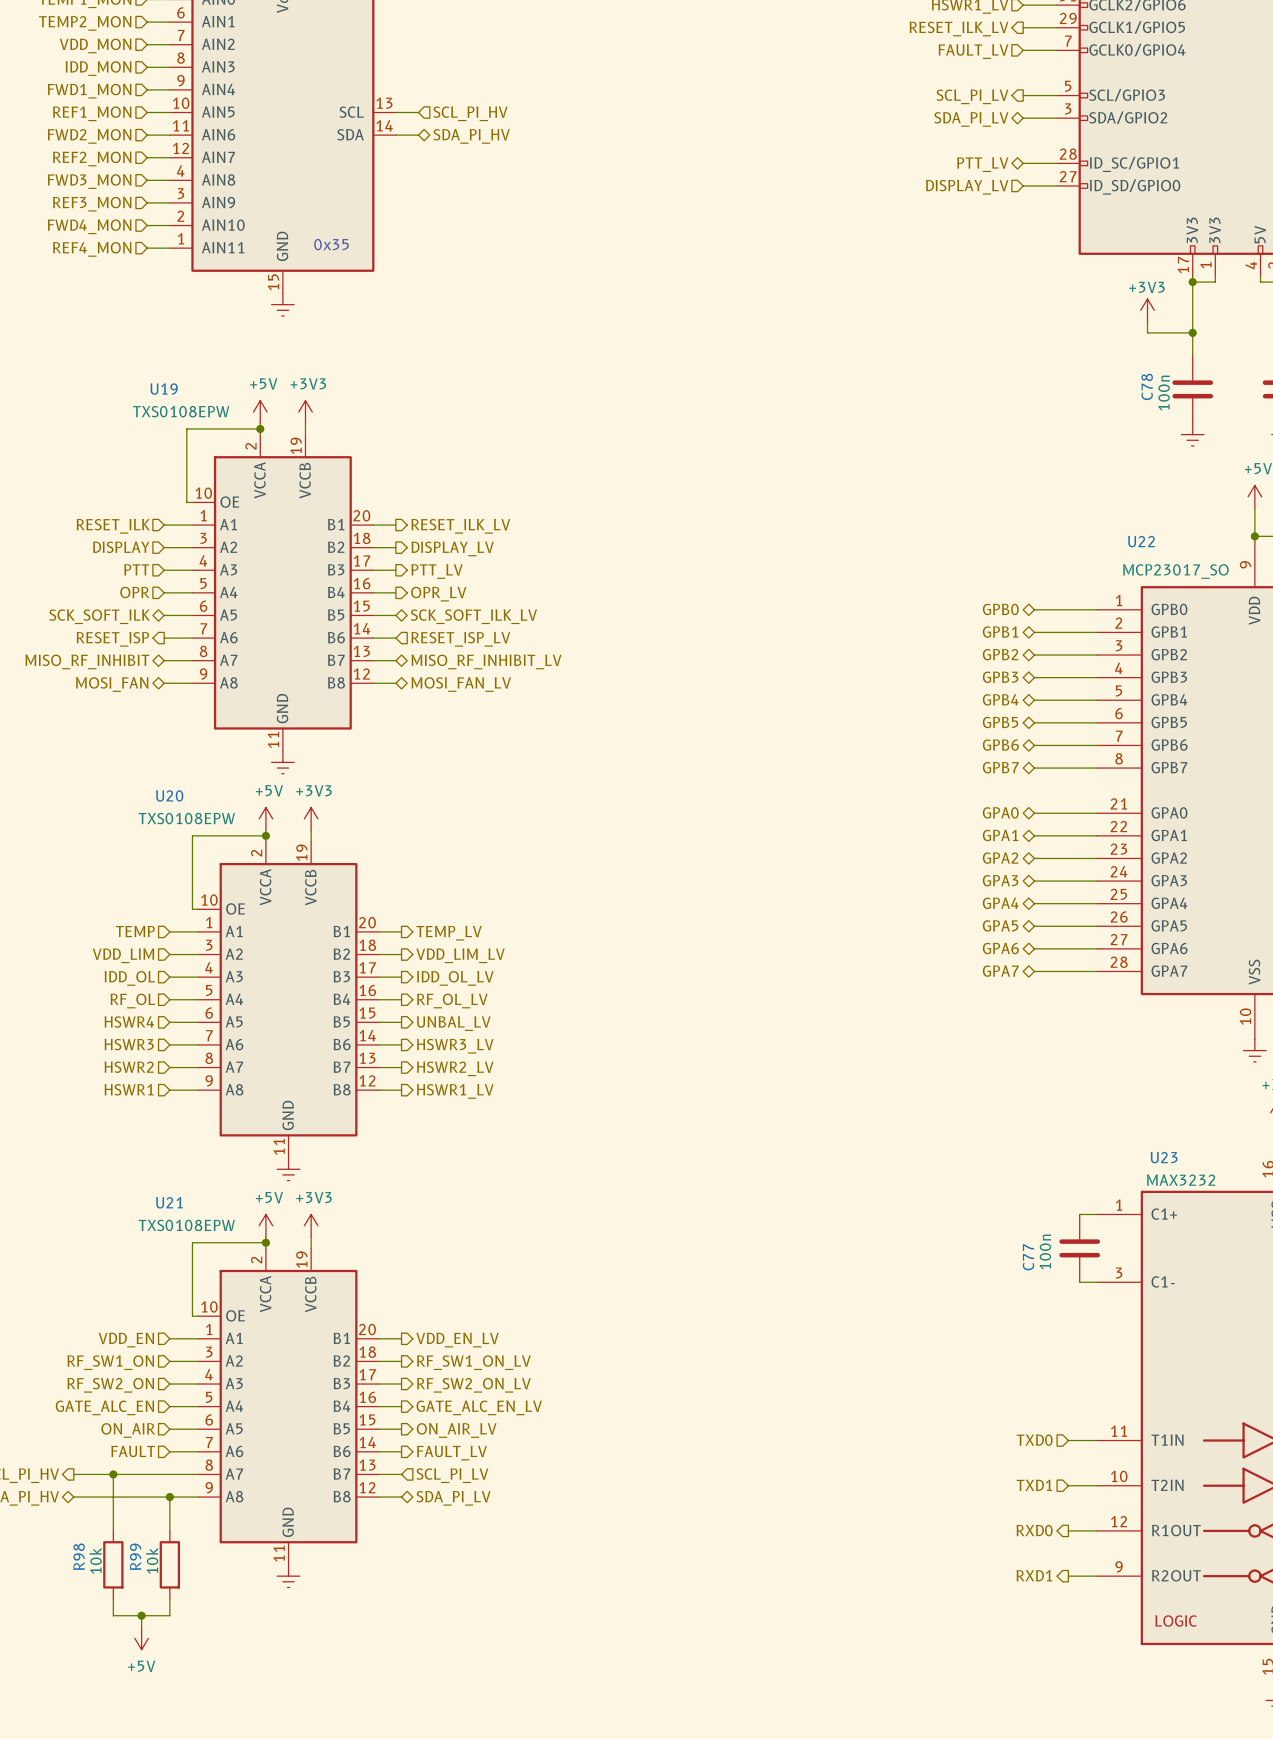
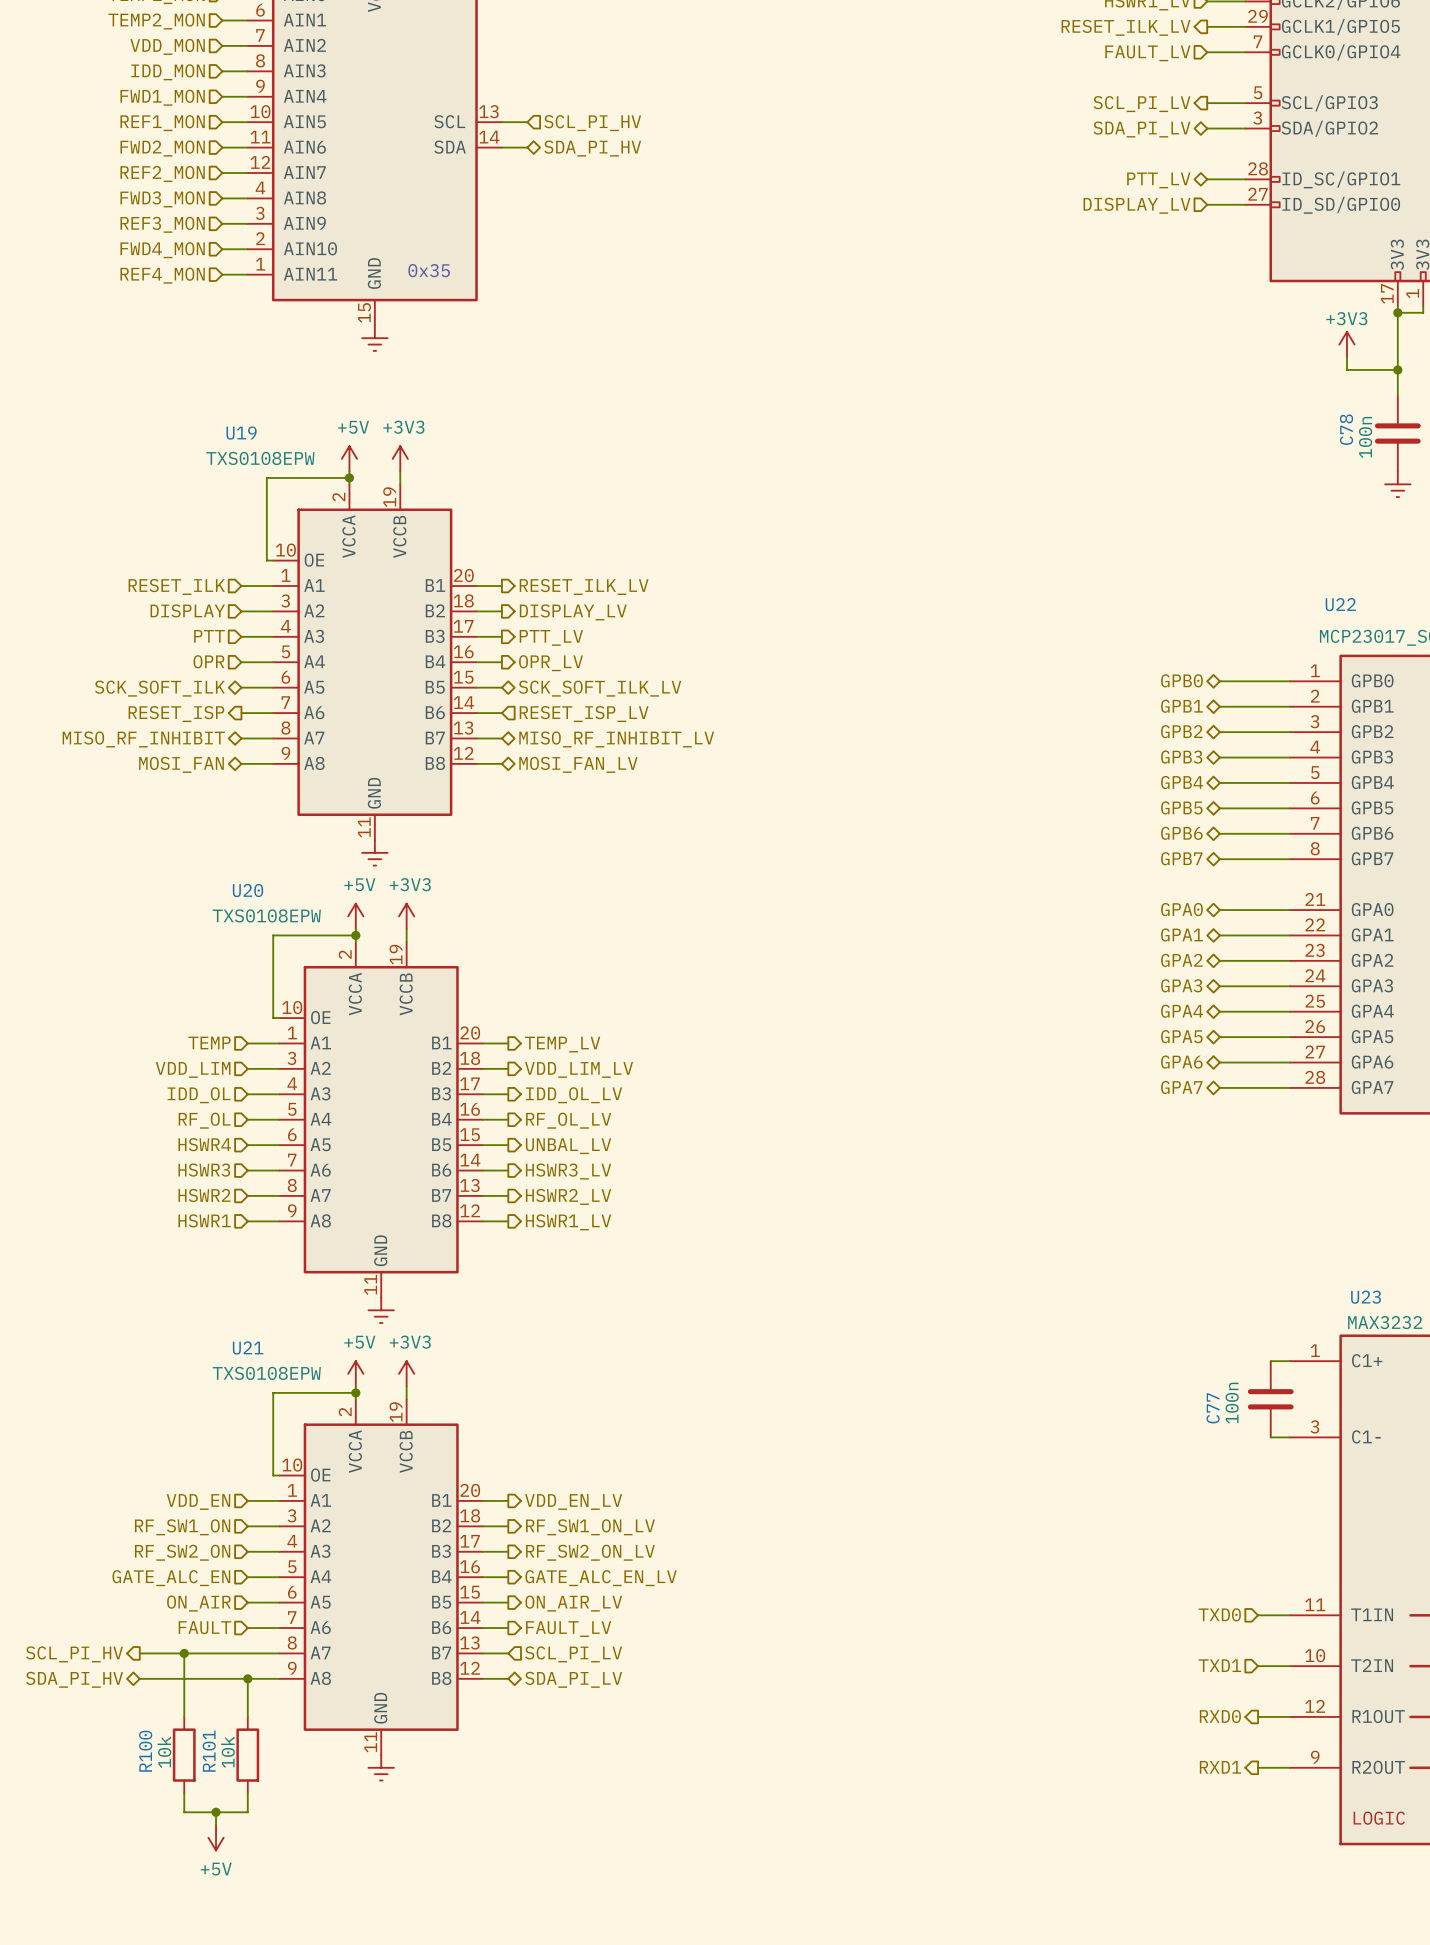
R98 name: R98 (79, 1556) -> R100 (145, 1751)
R99 name: R99 (135, 1556) -> R101 (209, 1751)

